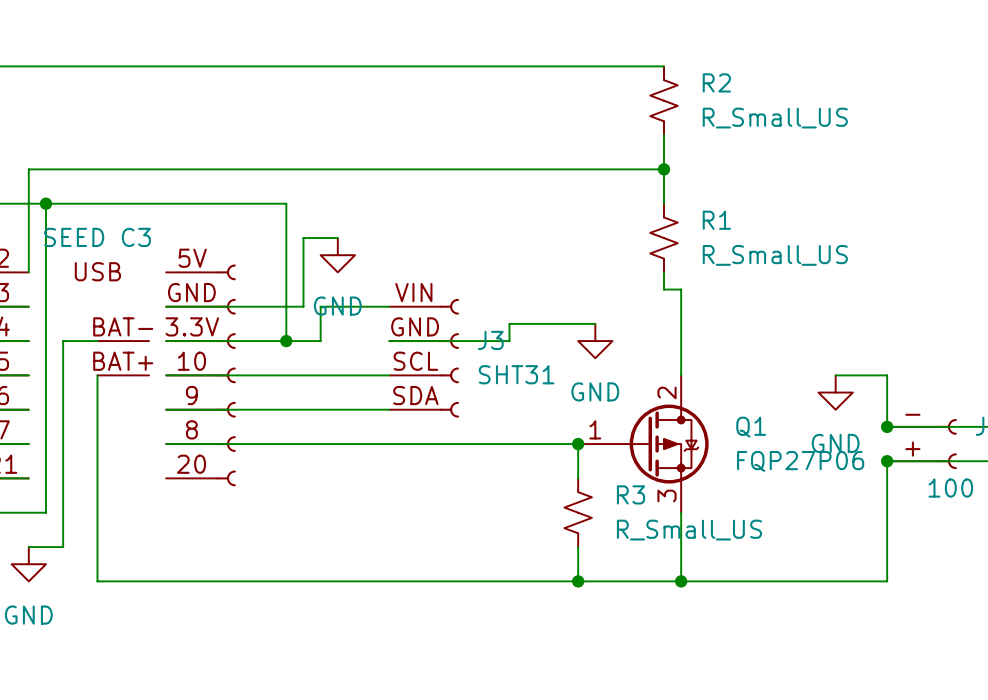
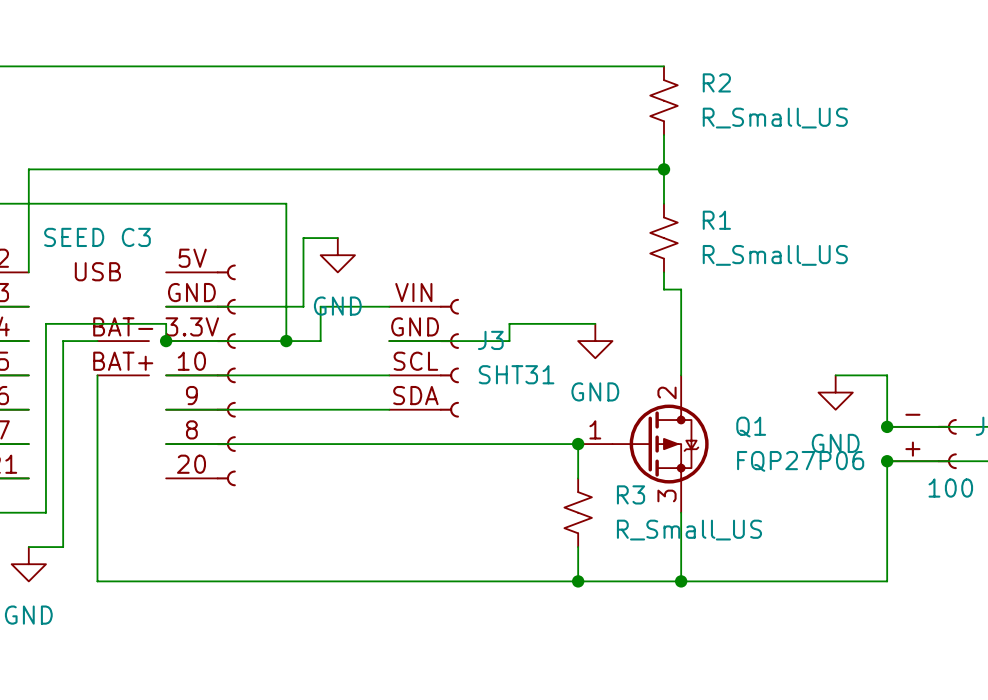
wire: (45, 203) (45, 323) -> (166, 341) (166, 323) (45, 323)
junction: (45, 203) -> none
junction: none -> (166, 341)

